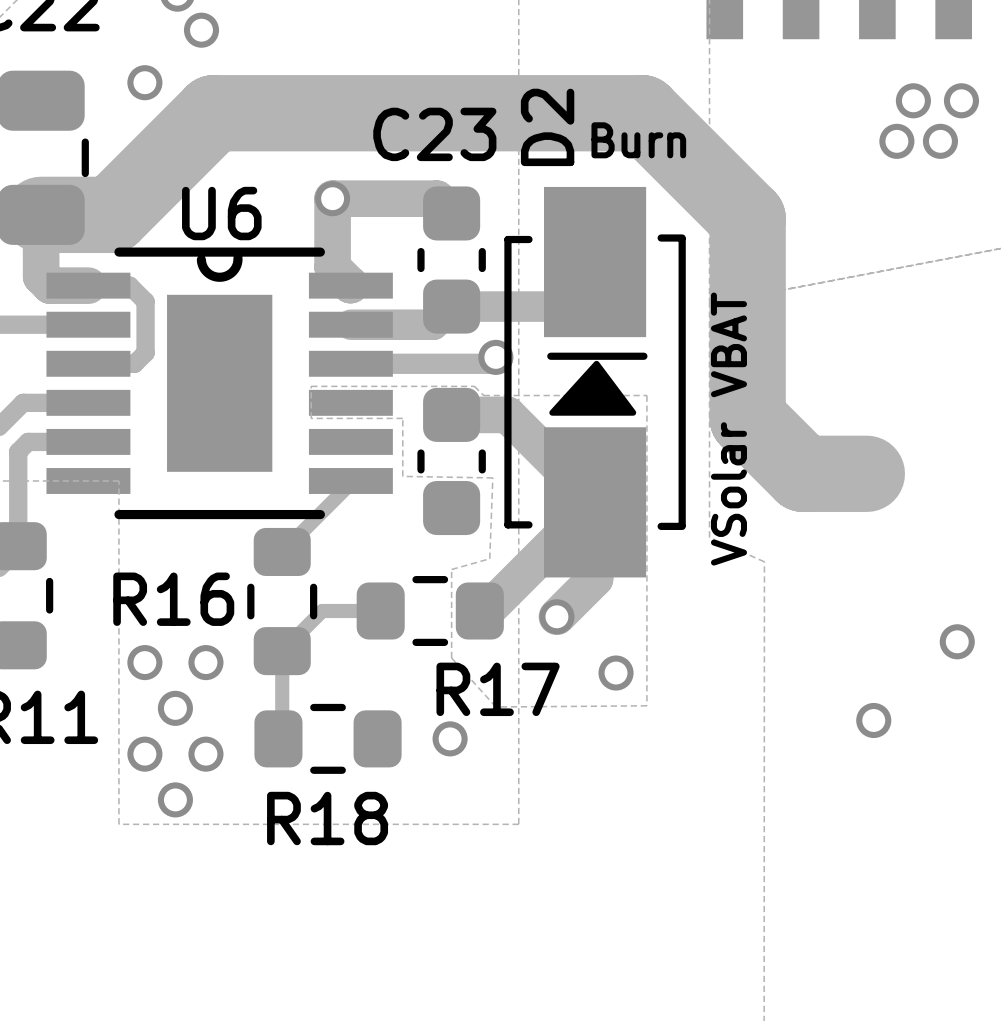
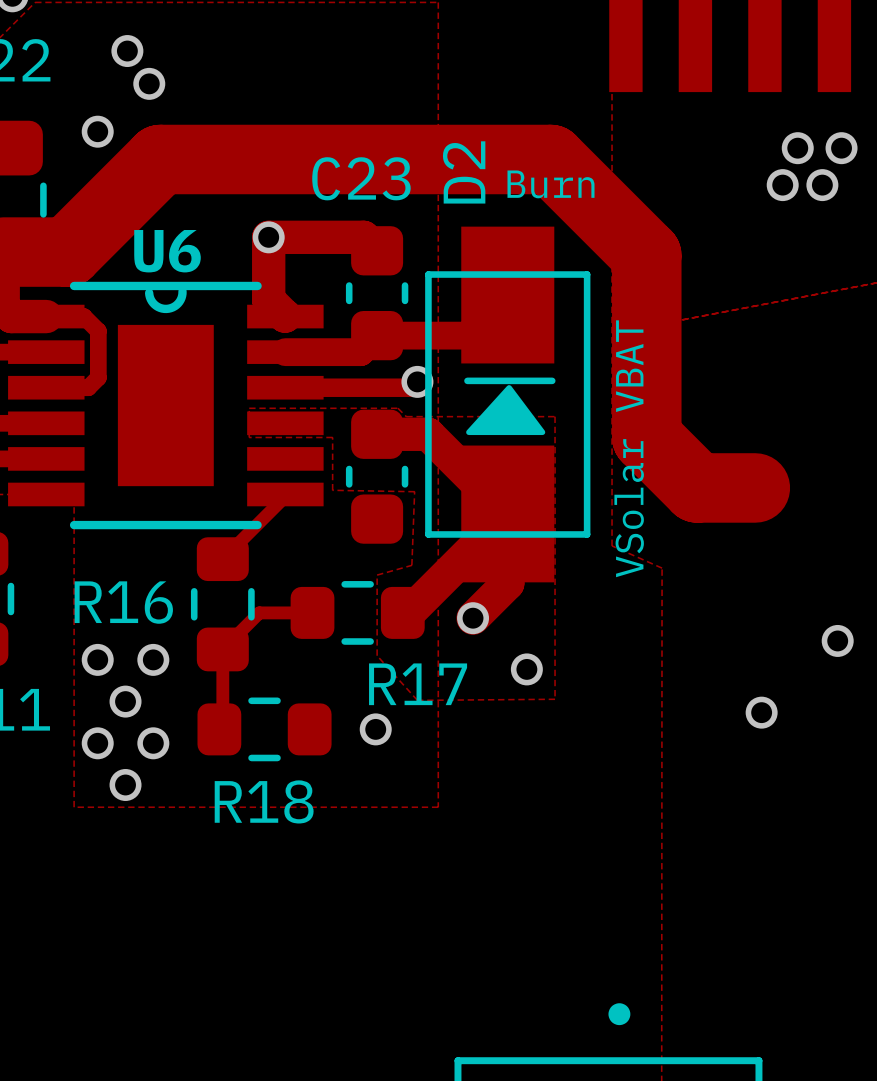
D2 footprint: [504, 186, 686, 578] -> [425, 226, 591, 583]

